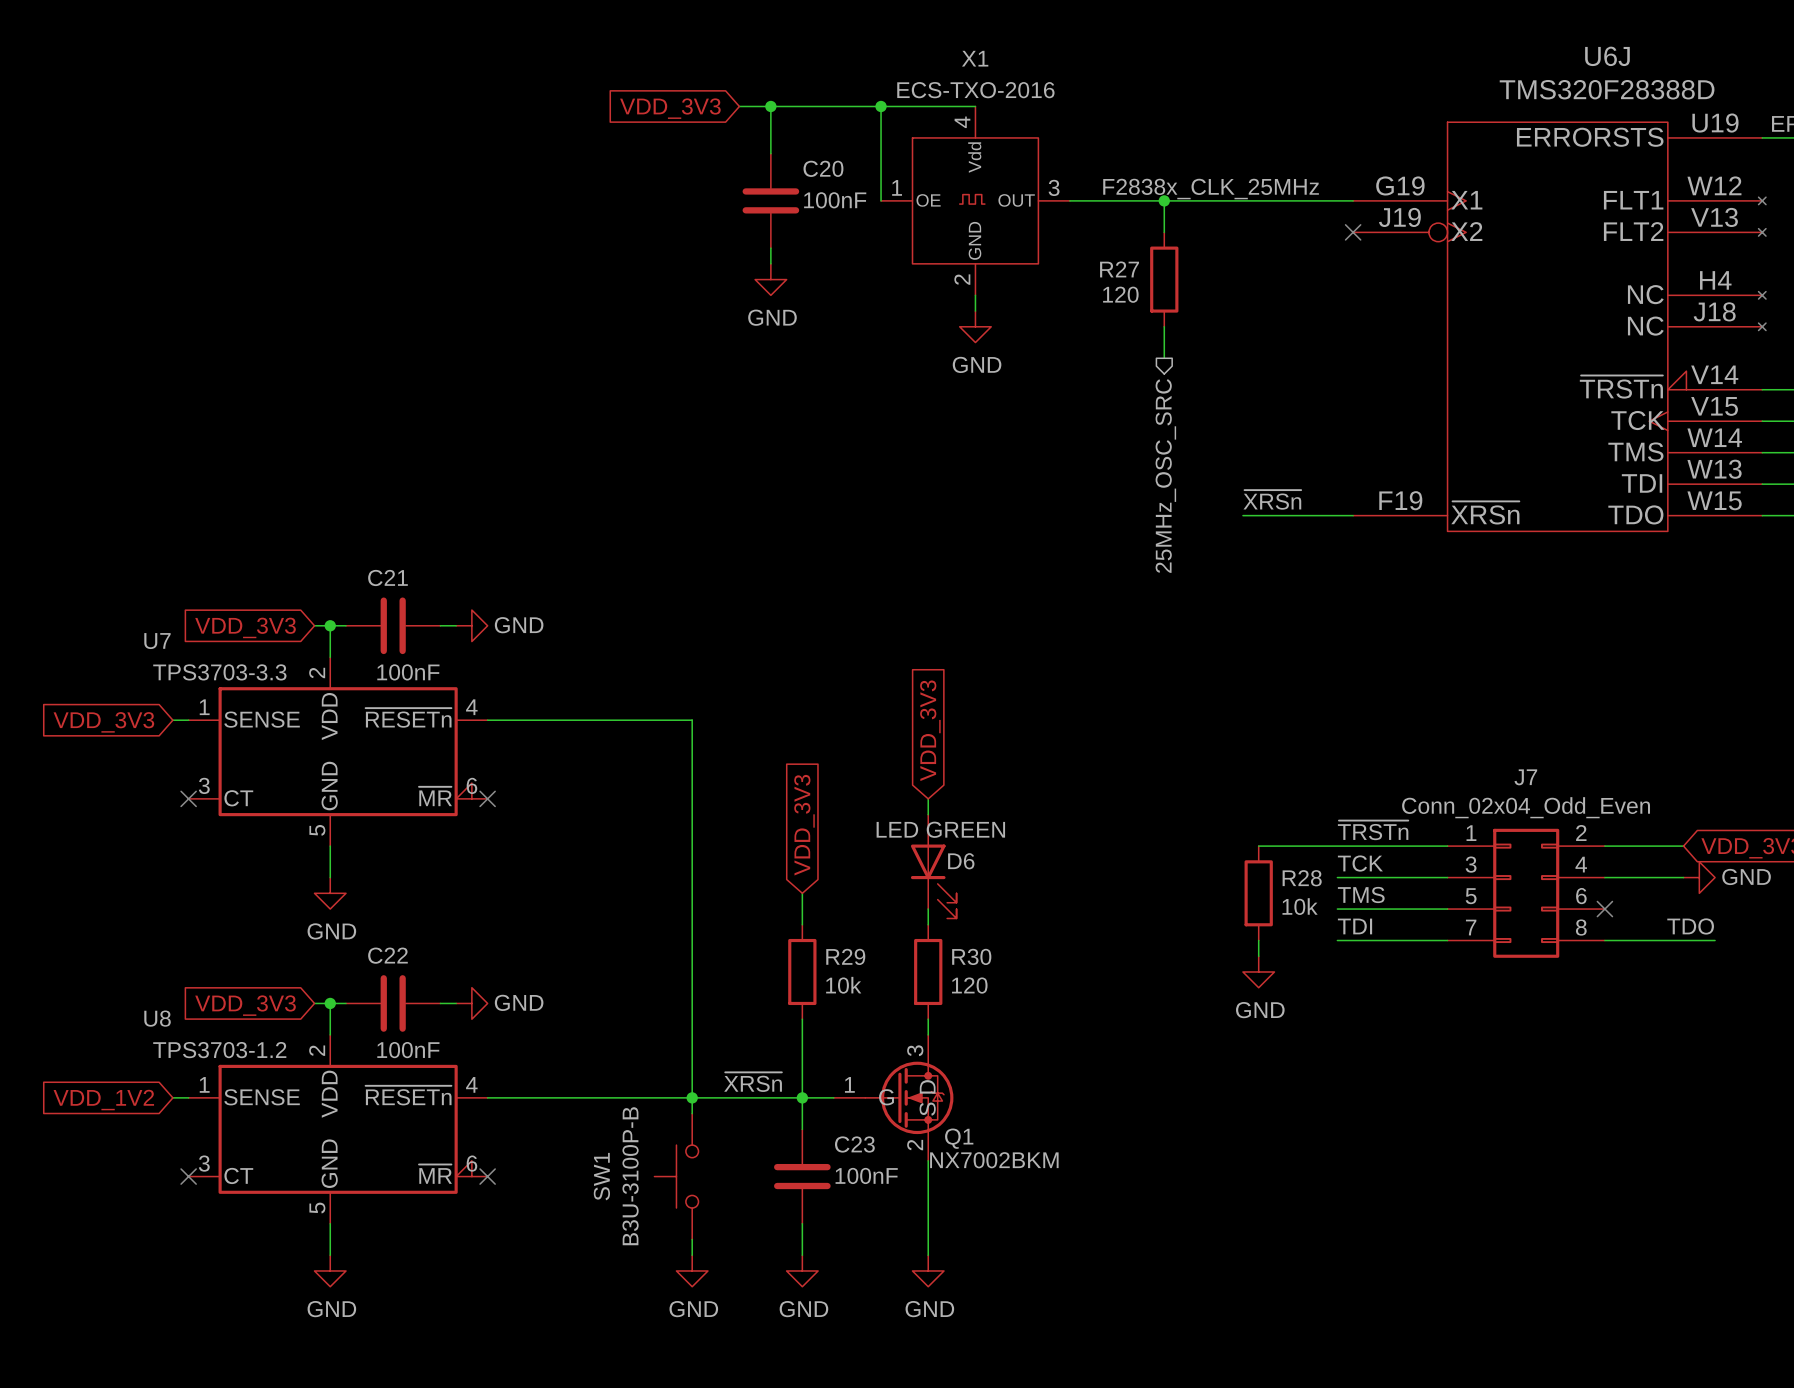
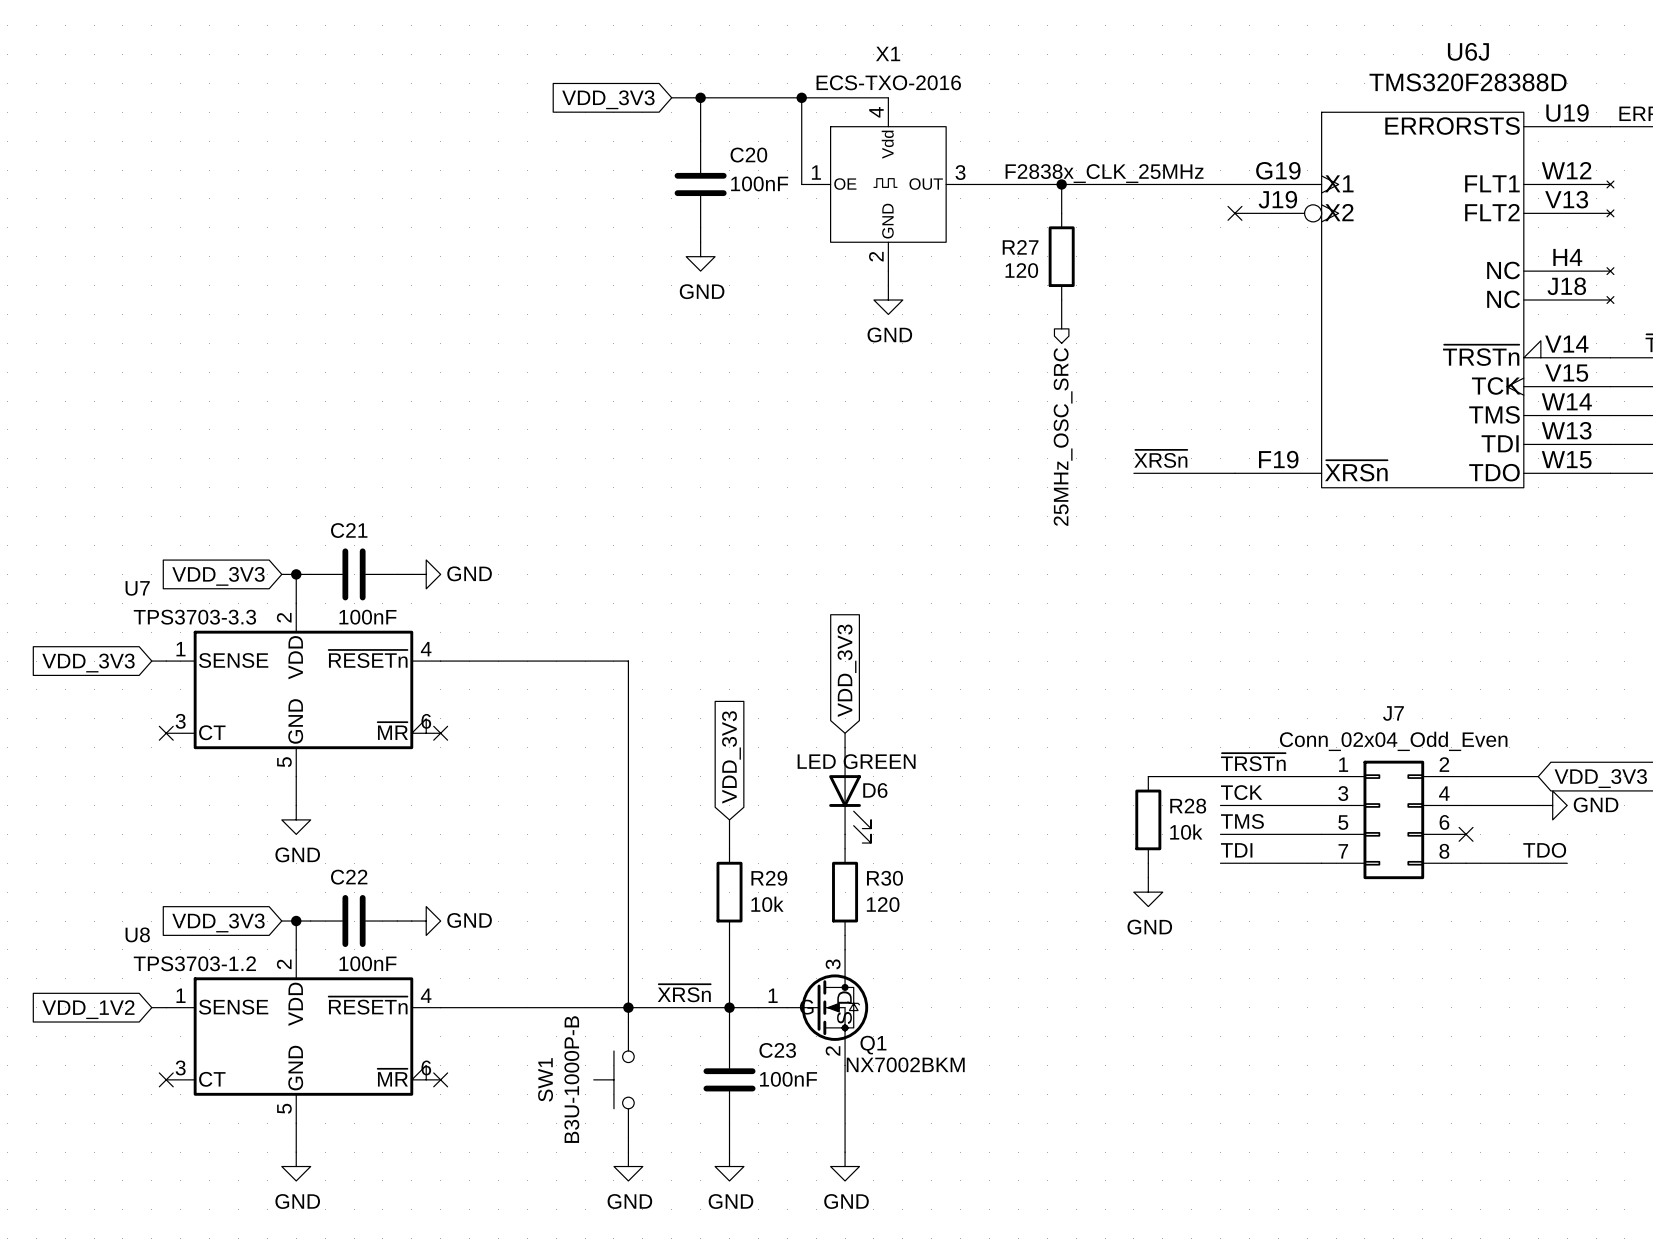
SW1 value: B3U-3100P-B (630, 1176) -> B3U-1000P-B (571, 1079)

